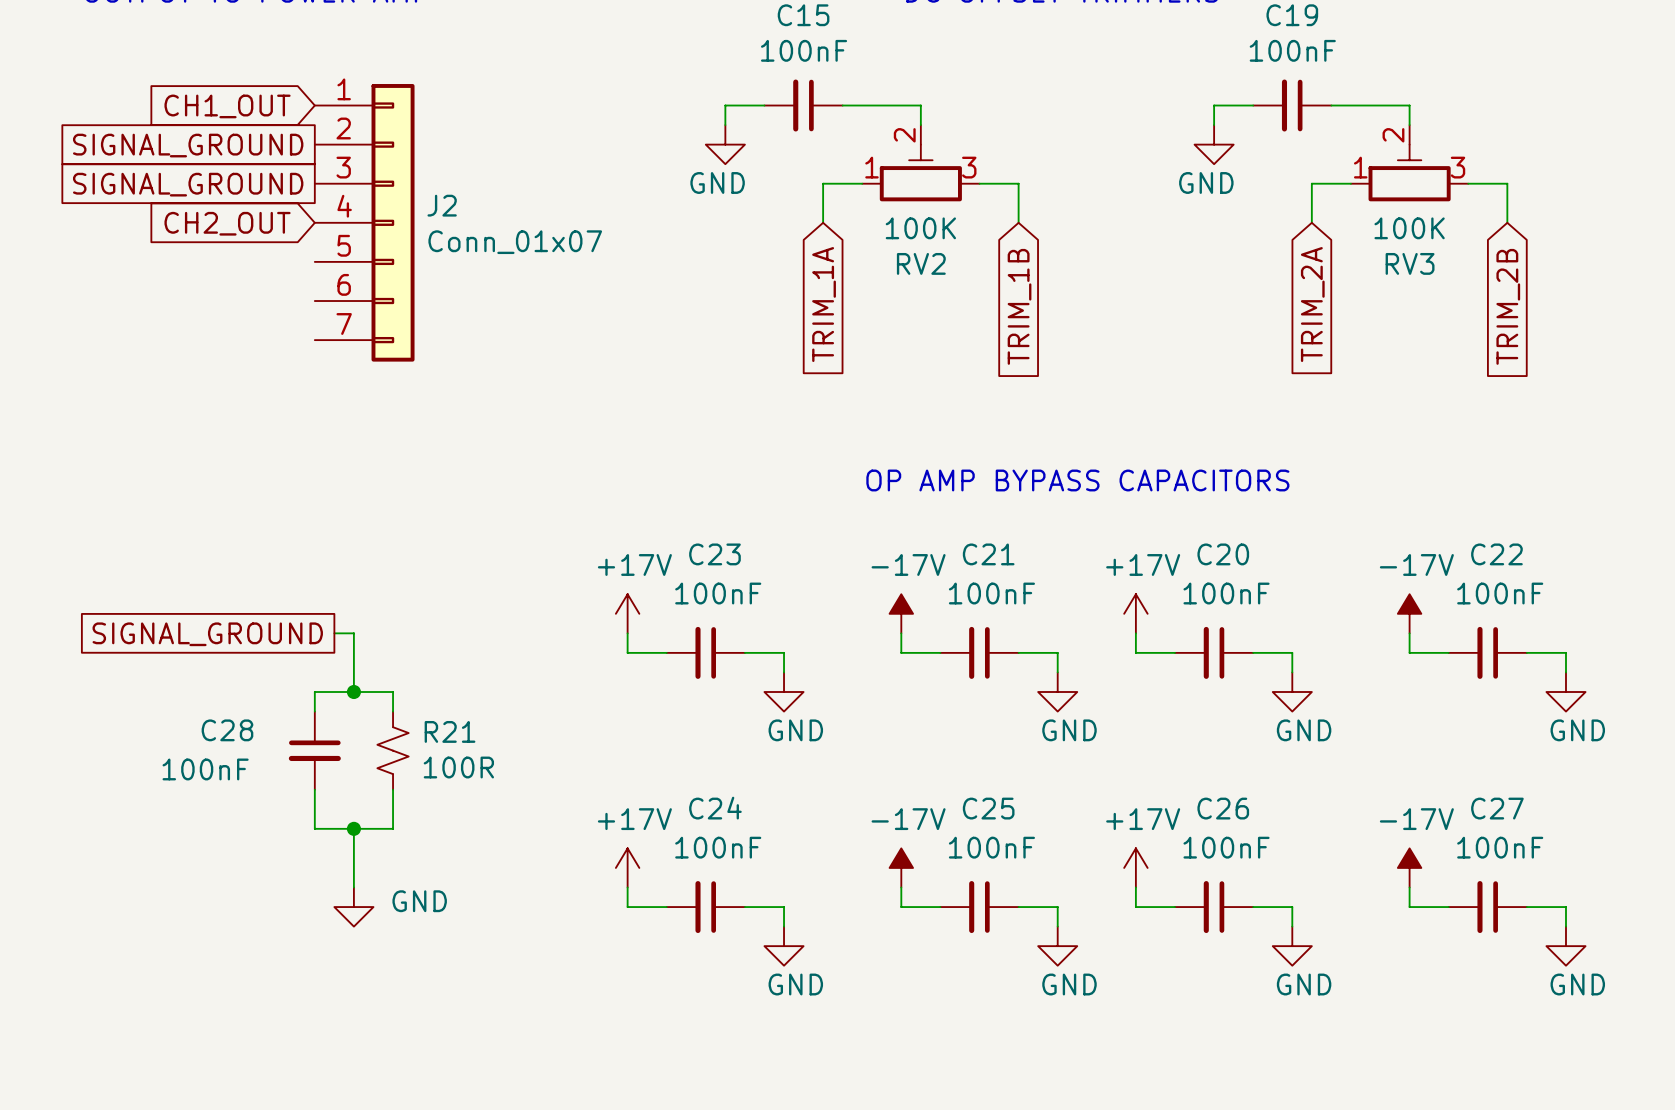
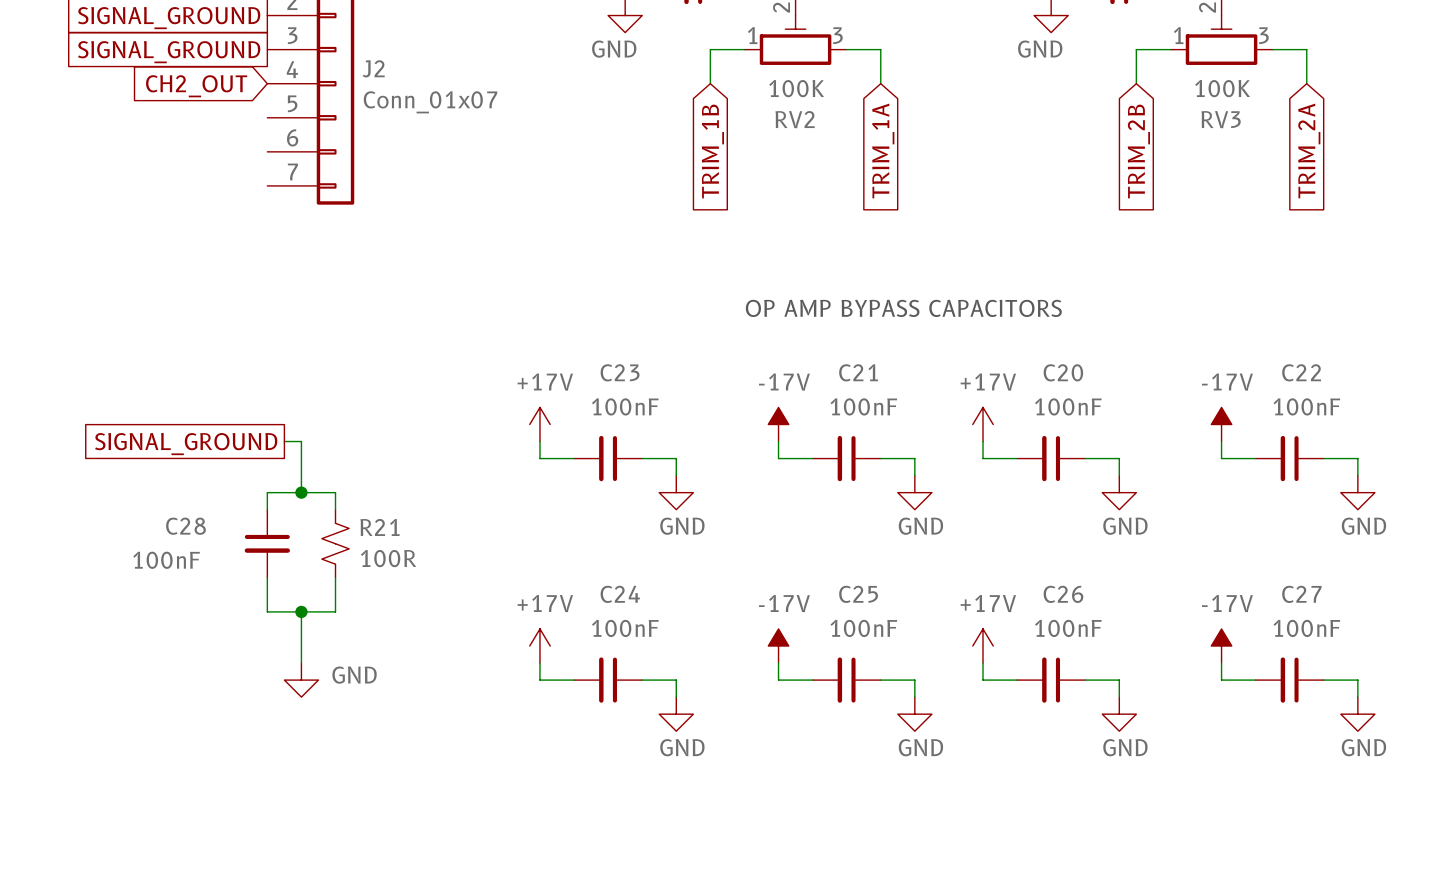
global label: TRIM_1A (824, 304) -> TRIM_1B (712, 151)
global label: TRIM_2A (1312, 304) -> TRIM_2B (1138, 151)
global label: TRIM_1B (1019, 306) -> TRIM_1A (883, 150)
global label: TRIM_2B (1508, 306) -> TRIM_2A (1309, 150)

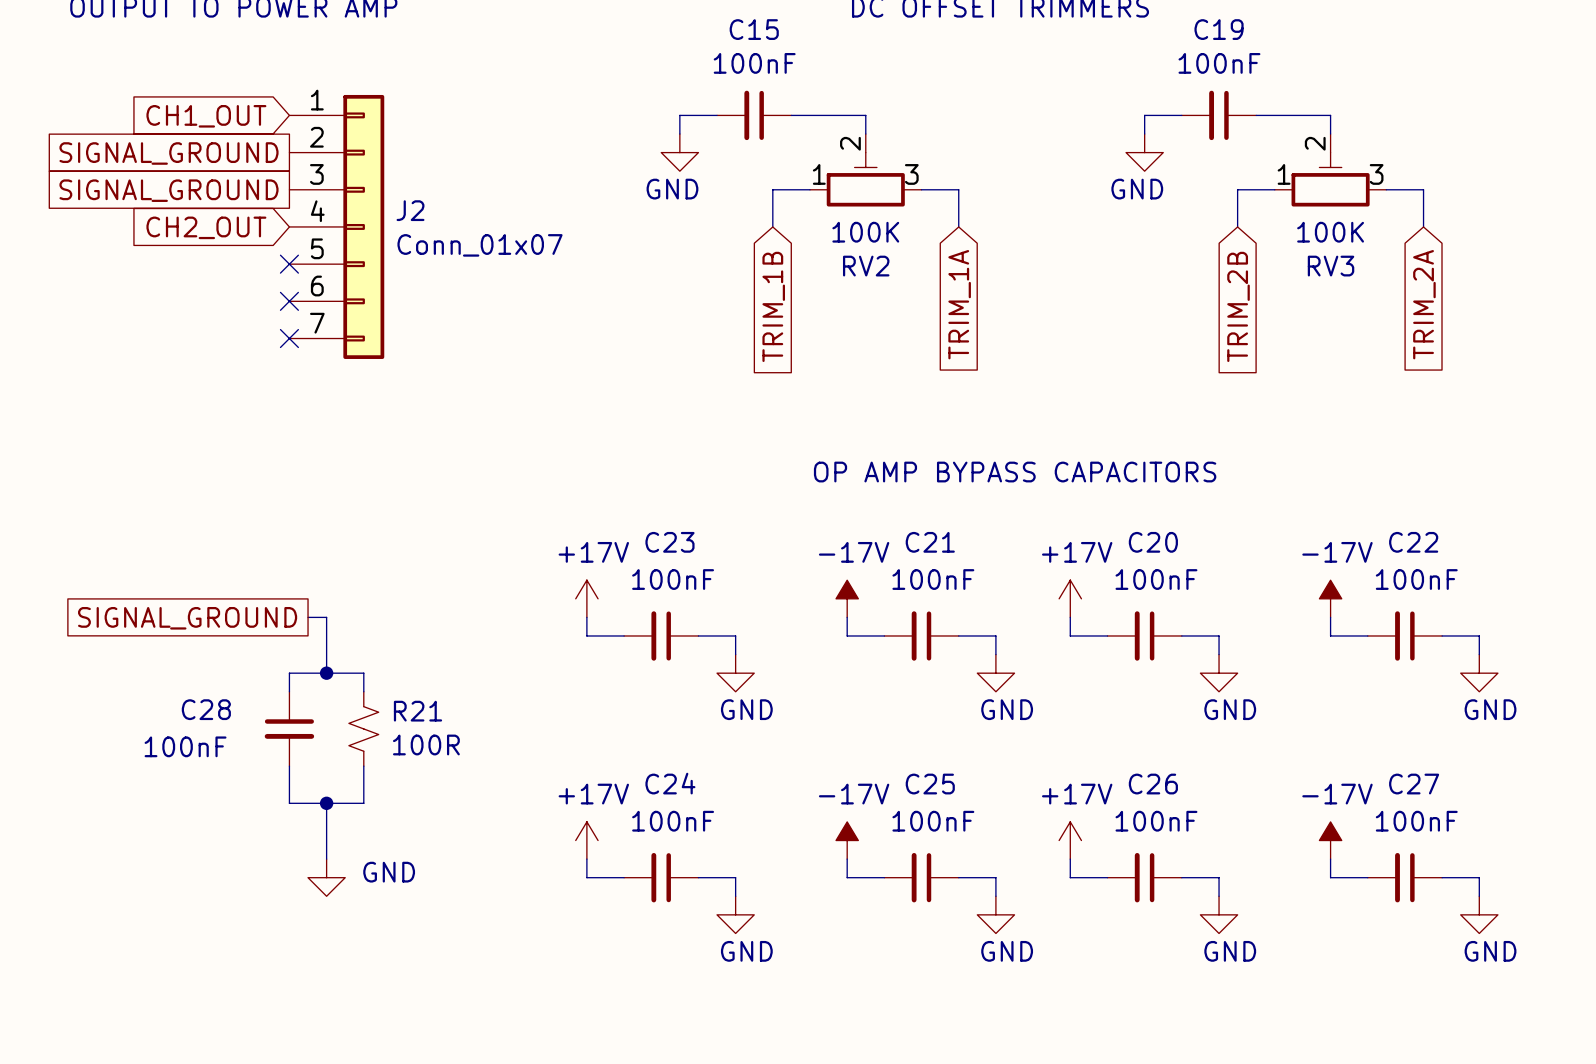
no-connect mark: none -> (289, 264)
no-connect mark: none -> (289, 301)
no-connect mark: none -> (289, 338)

